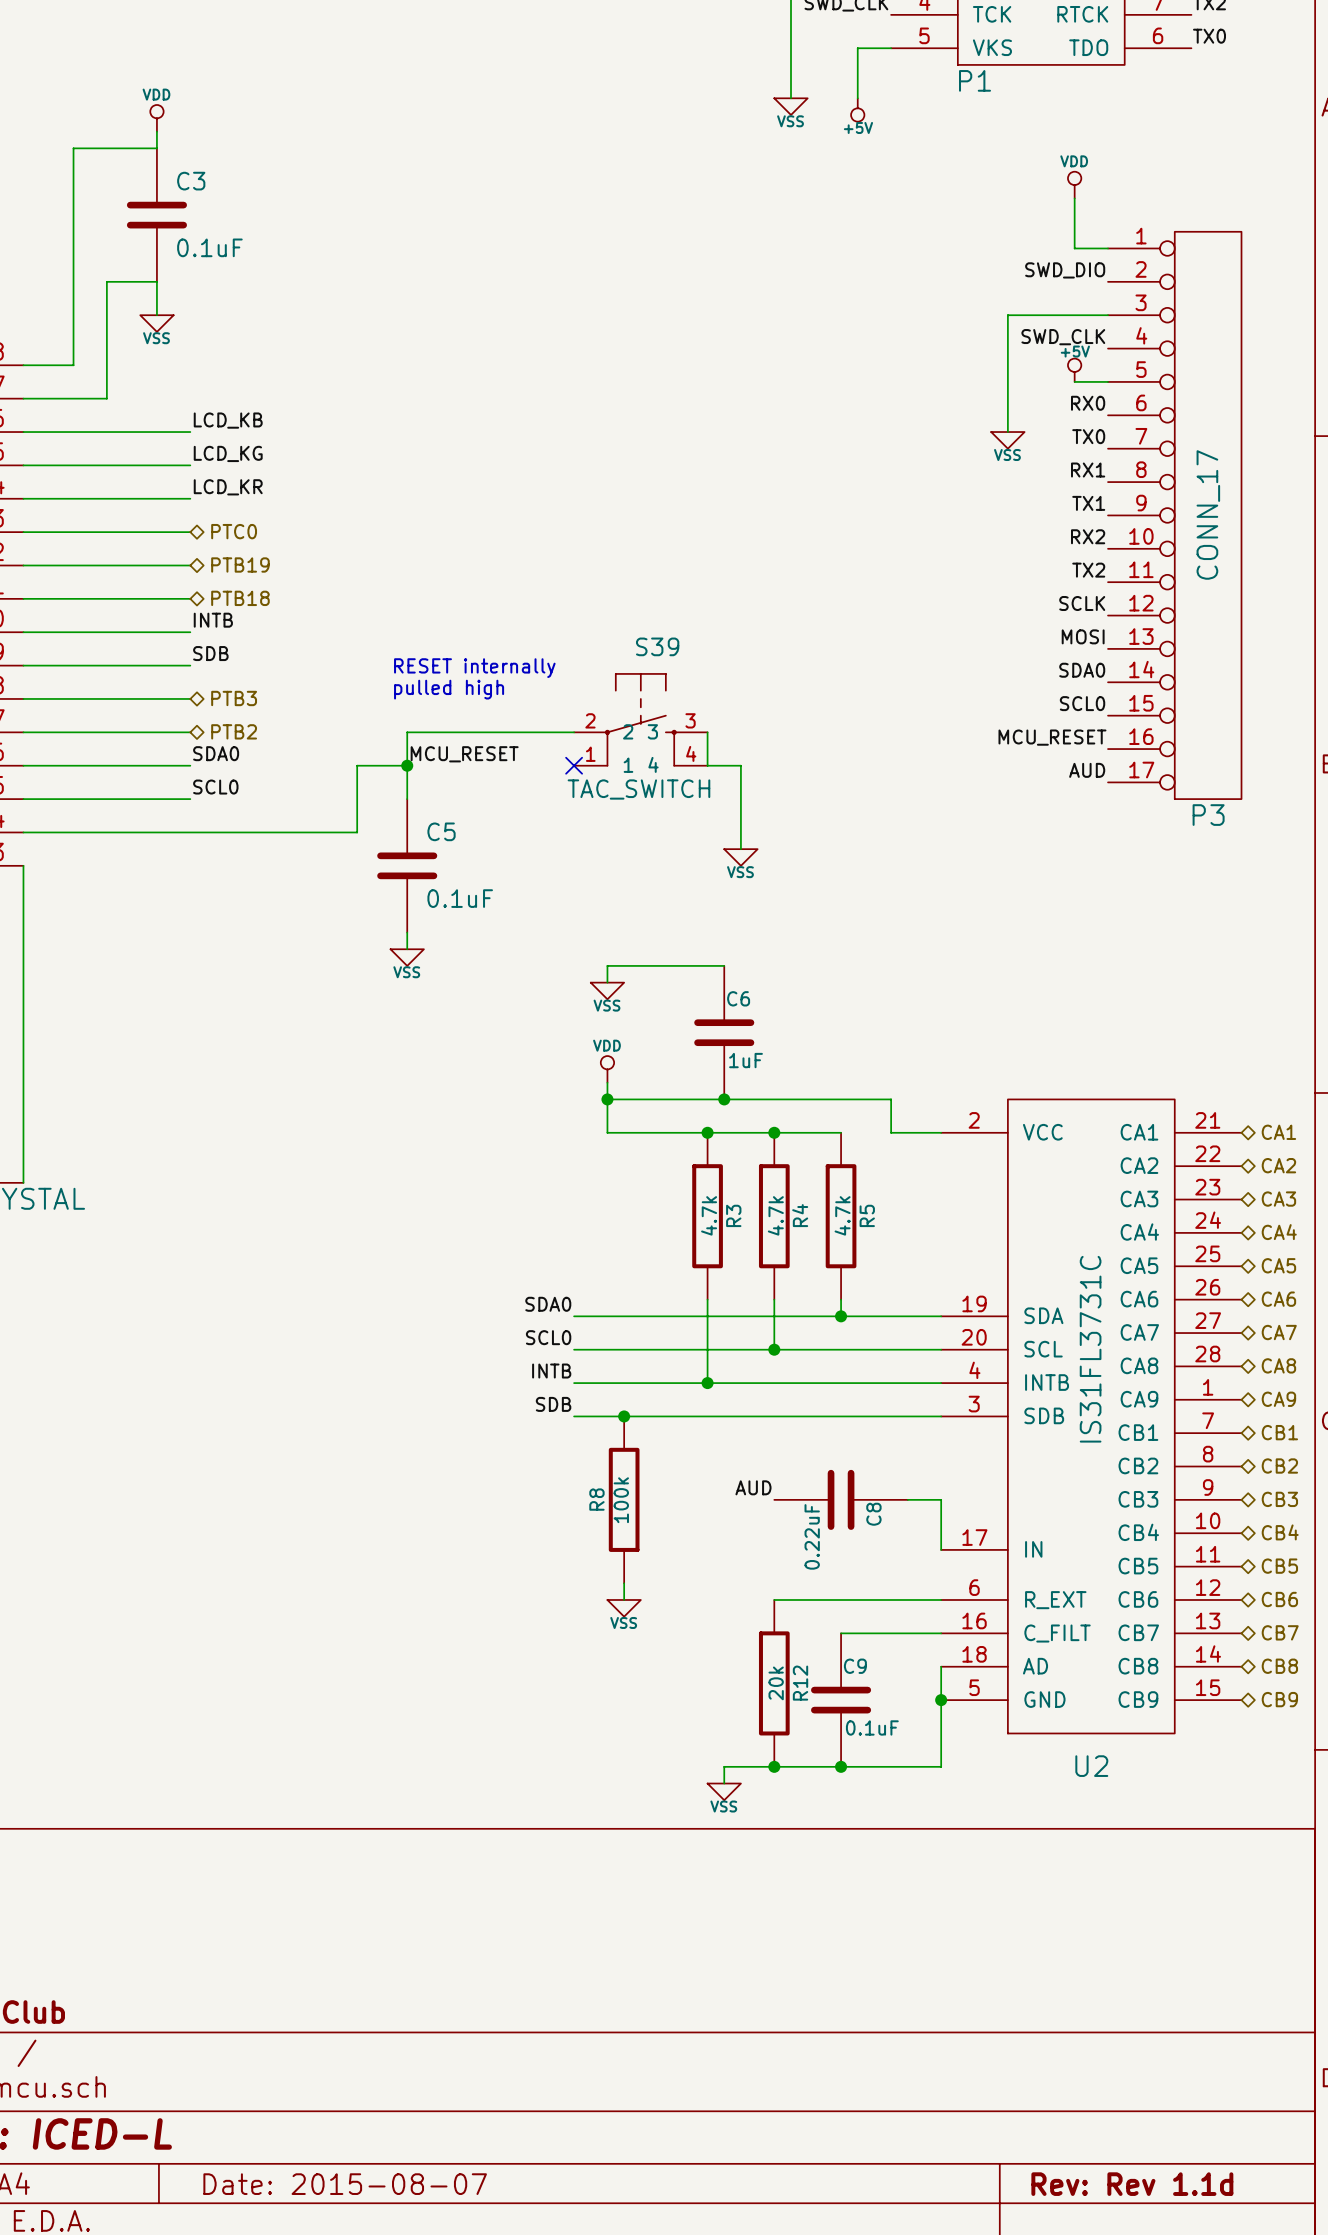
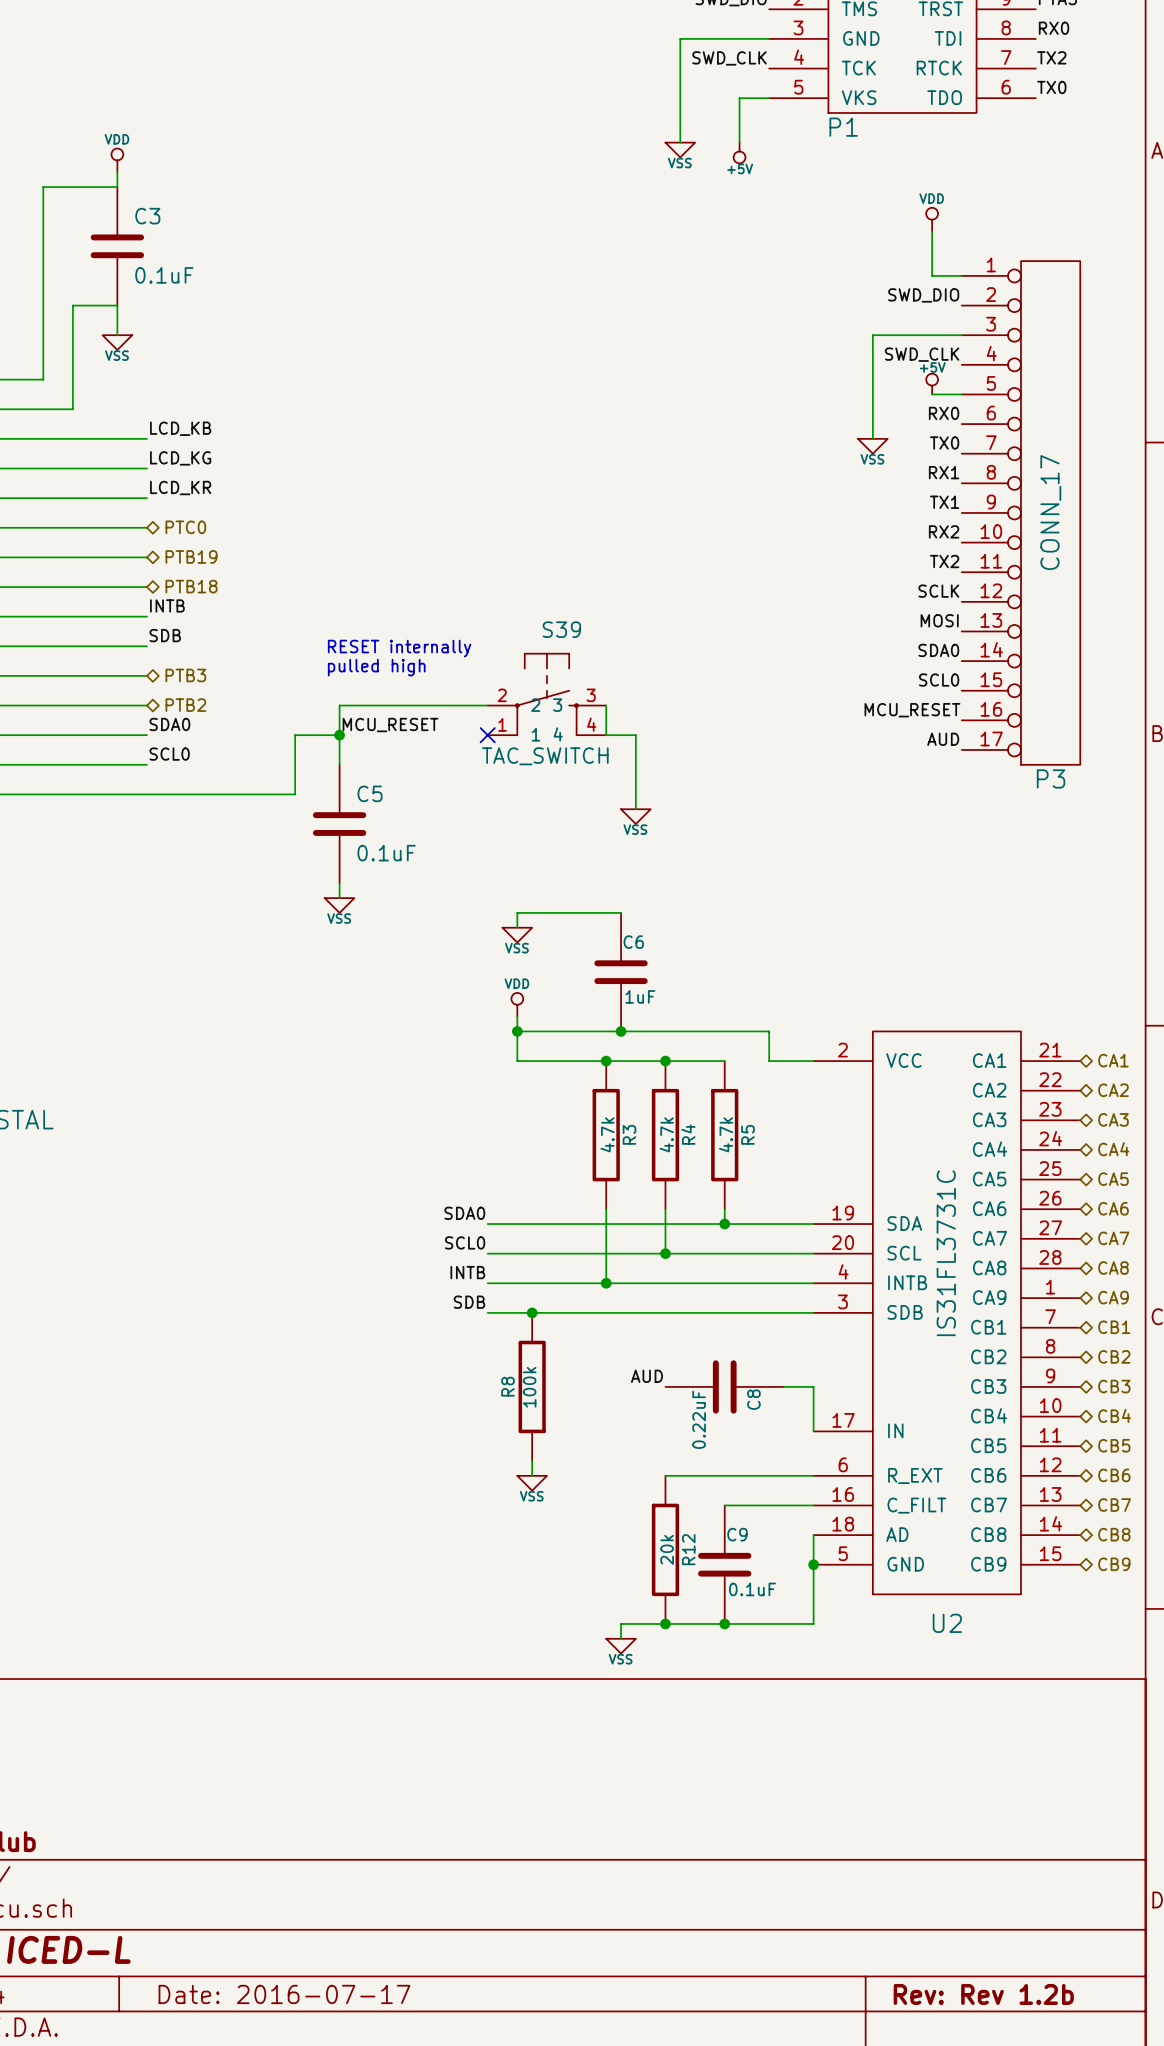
title block: Date: 2015-08-07 (345, 2184) -> Date: 2016-07-17 (284, 1994)
title block: Rev: Rev 1.1d (1132, 2184) -> Rev: Rev 1.2b (983, 1994)

